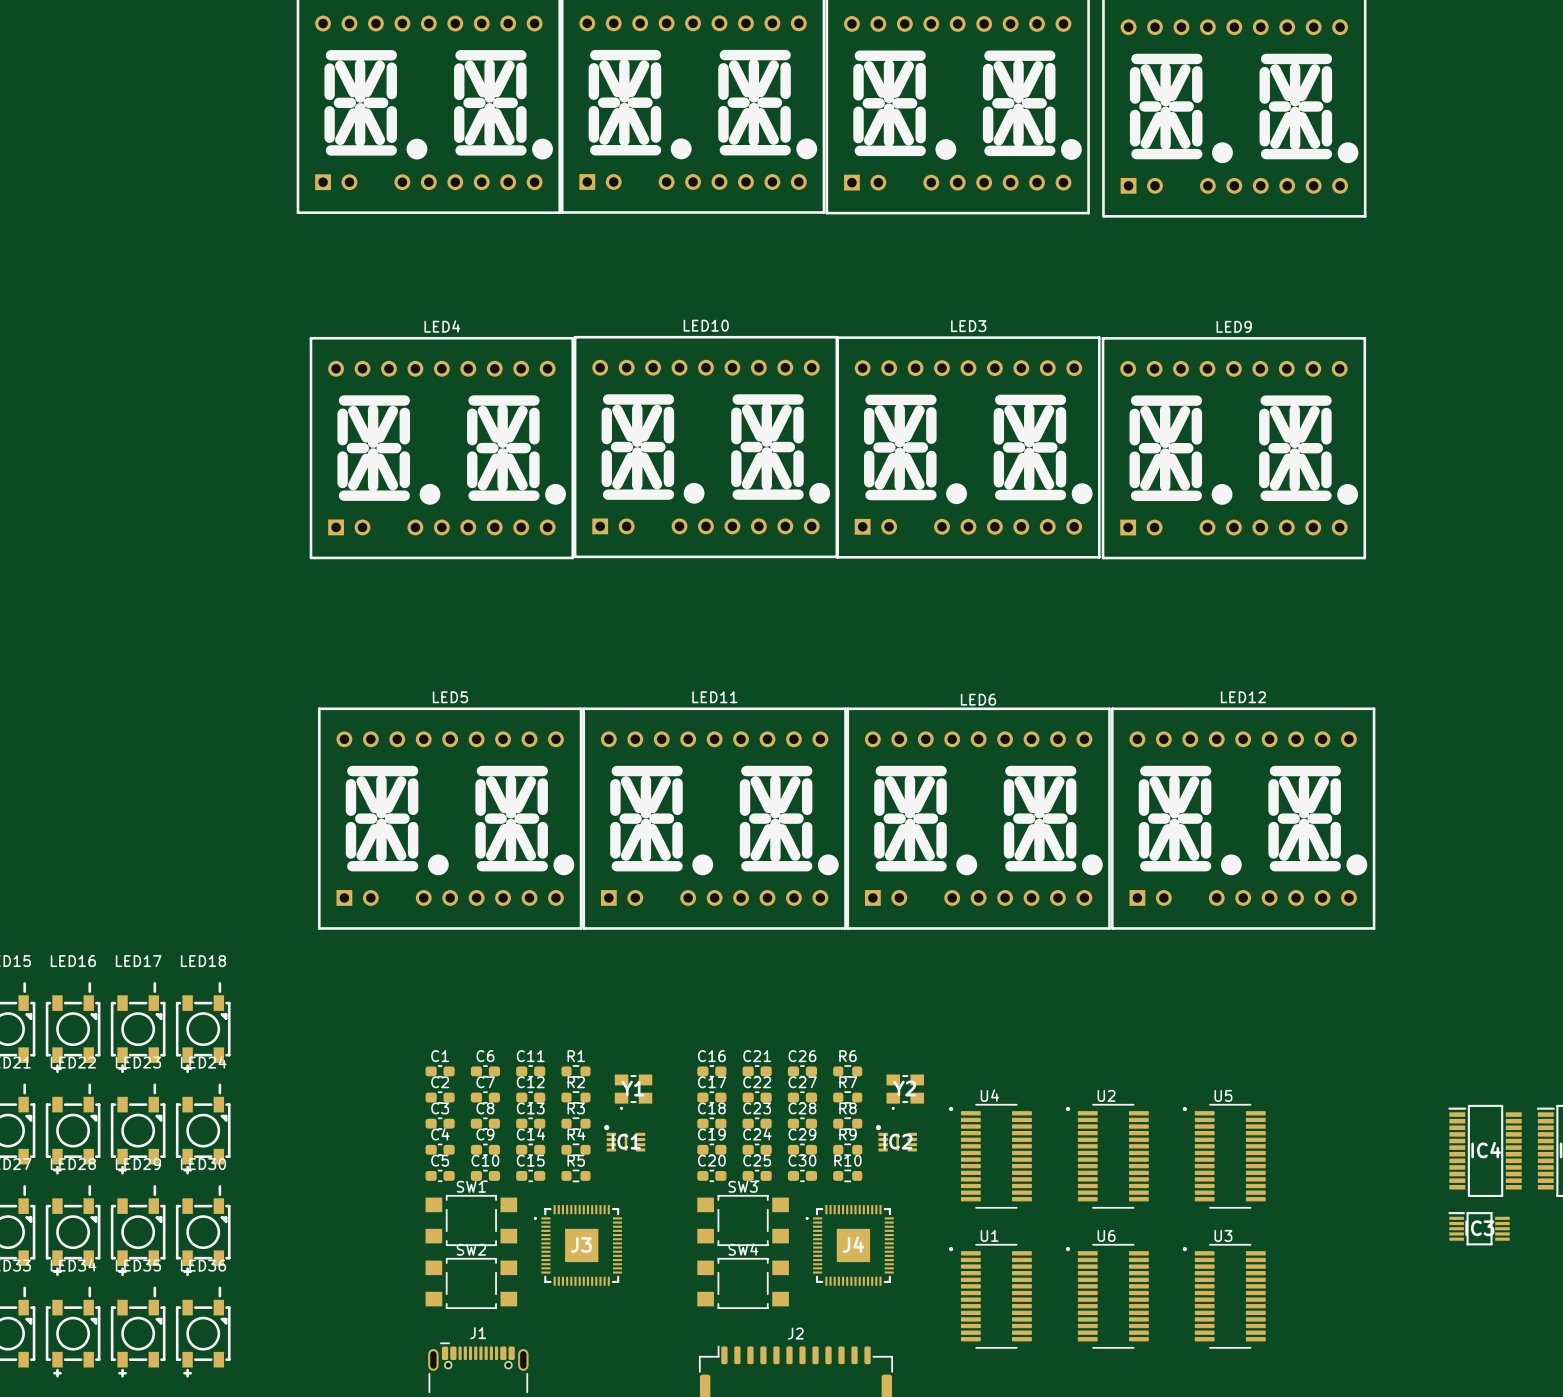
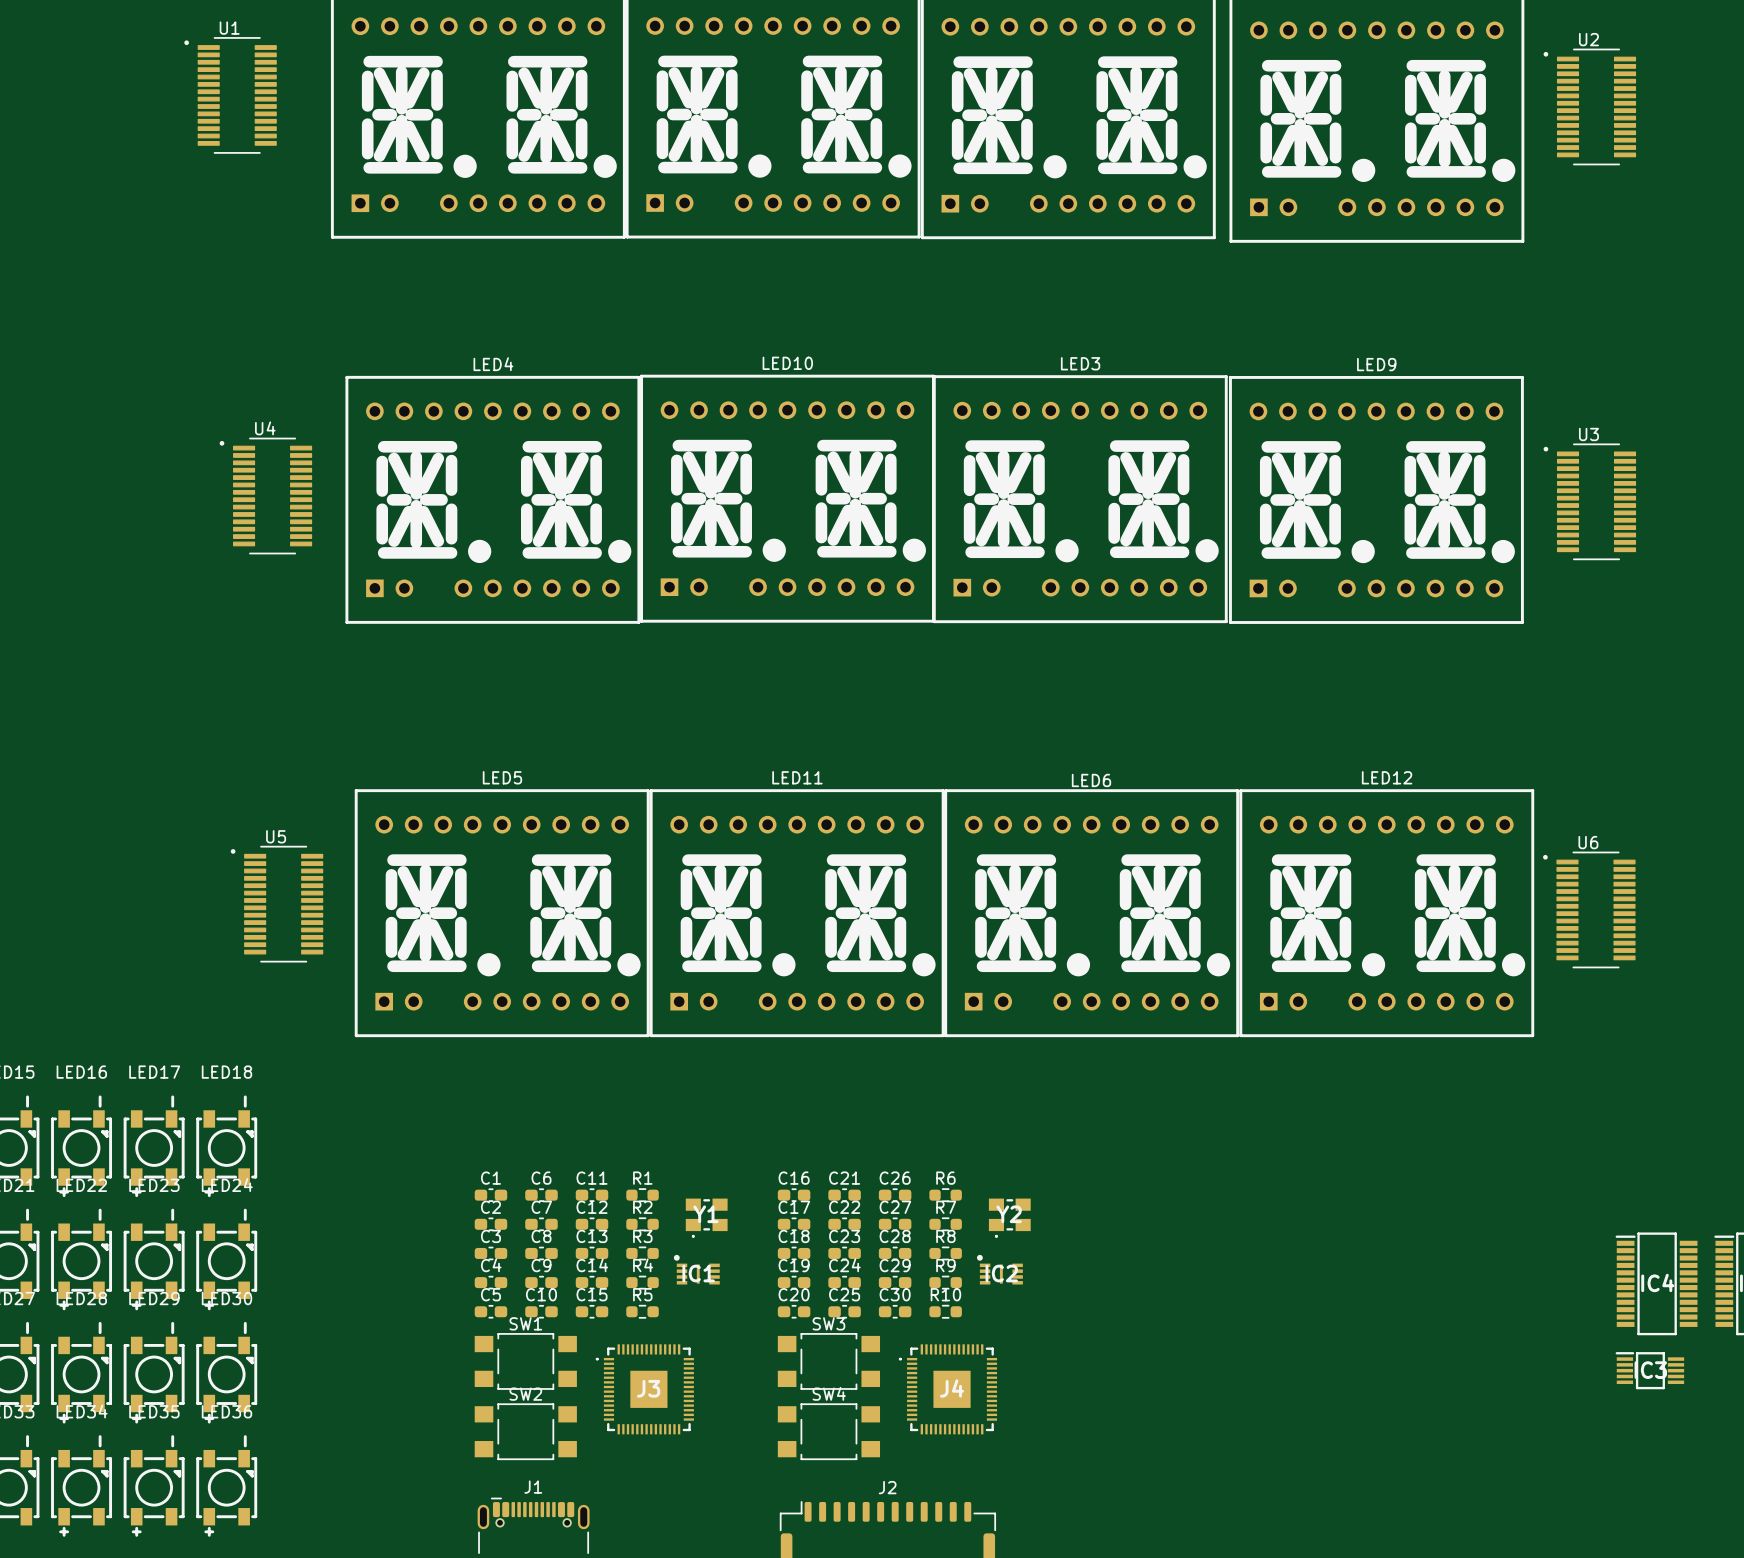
U4 position: (990, 1156) -> (265, 496)
U2 position: (1107, 1156) -> (1589, 106)
U5 position: (1224, 1156) -> (276, 904)
U1 position: (990, 1296) -> (230, 95)
U6 position: (1107, 1296) -> (1589, 909)
U3 position: (1224, 1296) -> (1589, 501)

